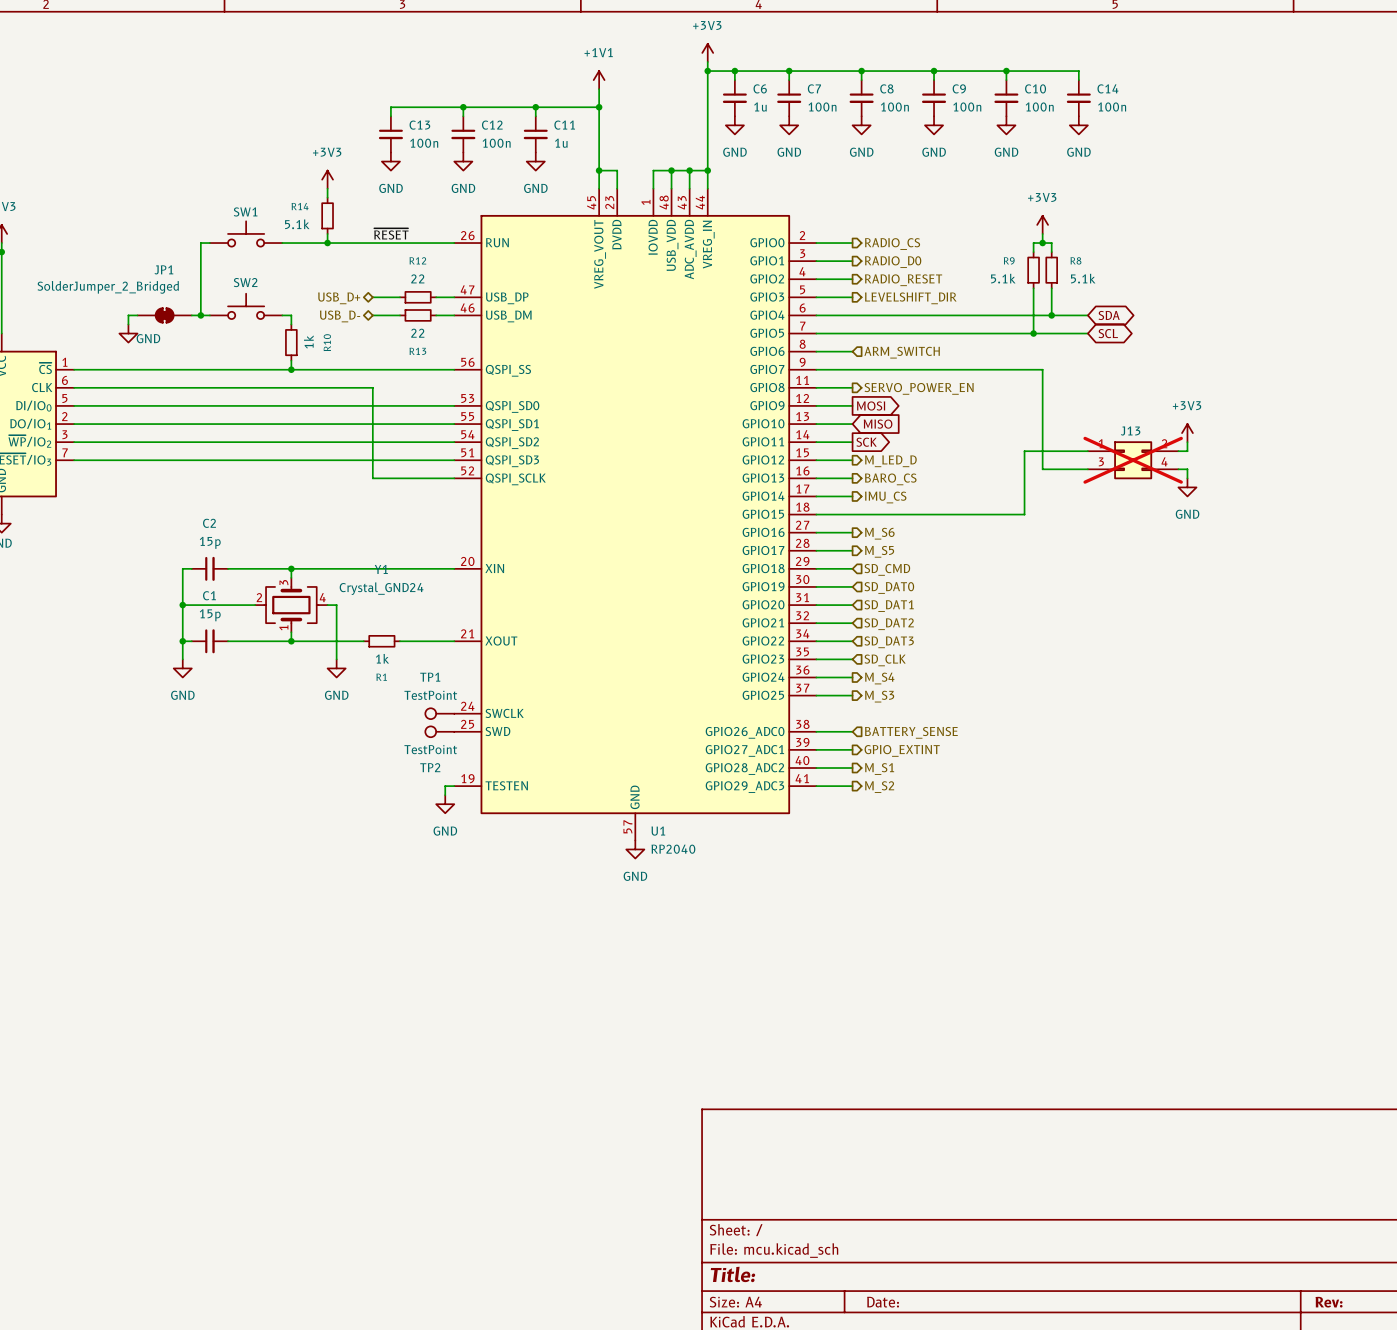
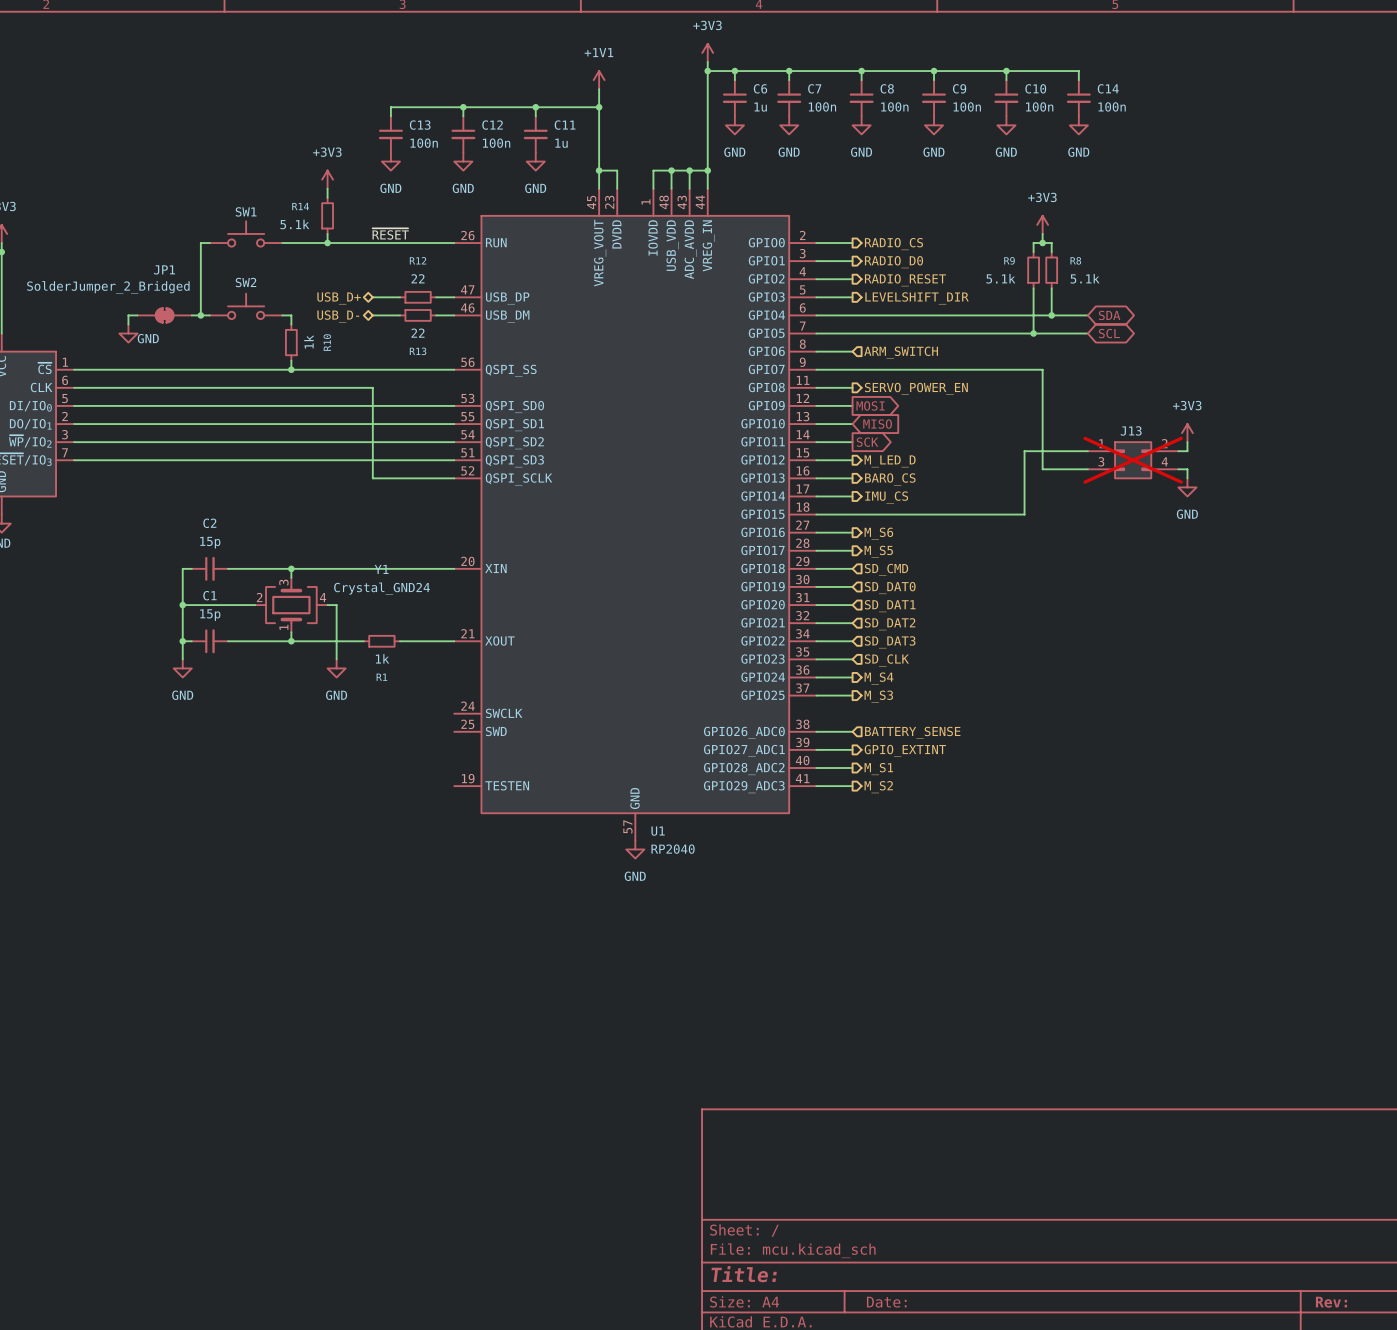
TP1: TestPoint (439, 713) -> none
TP2: TestPoint (439, 731) -> none
wire: (454, 786) (445, 786) (445, 795) -> none
power symbol: GND (445, 804) -> none

